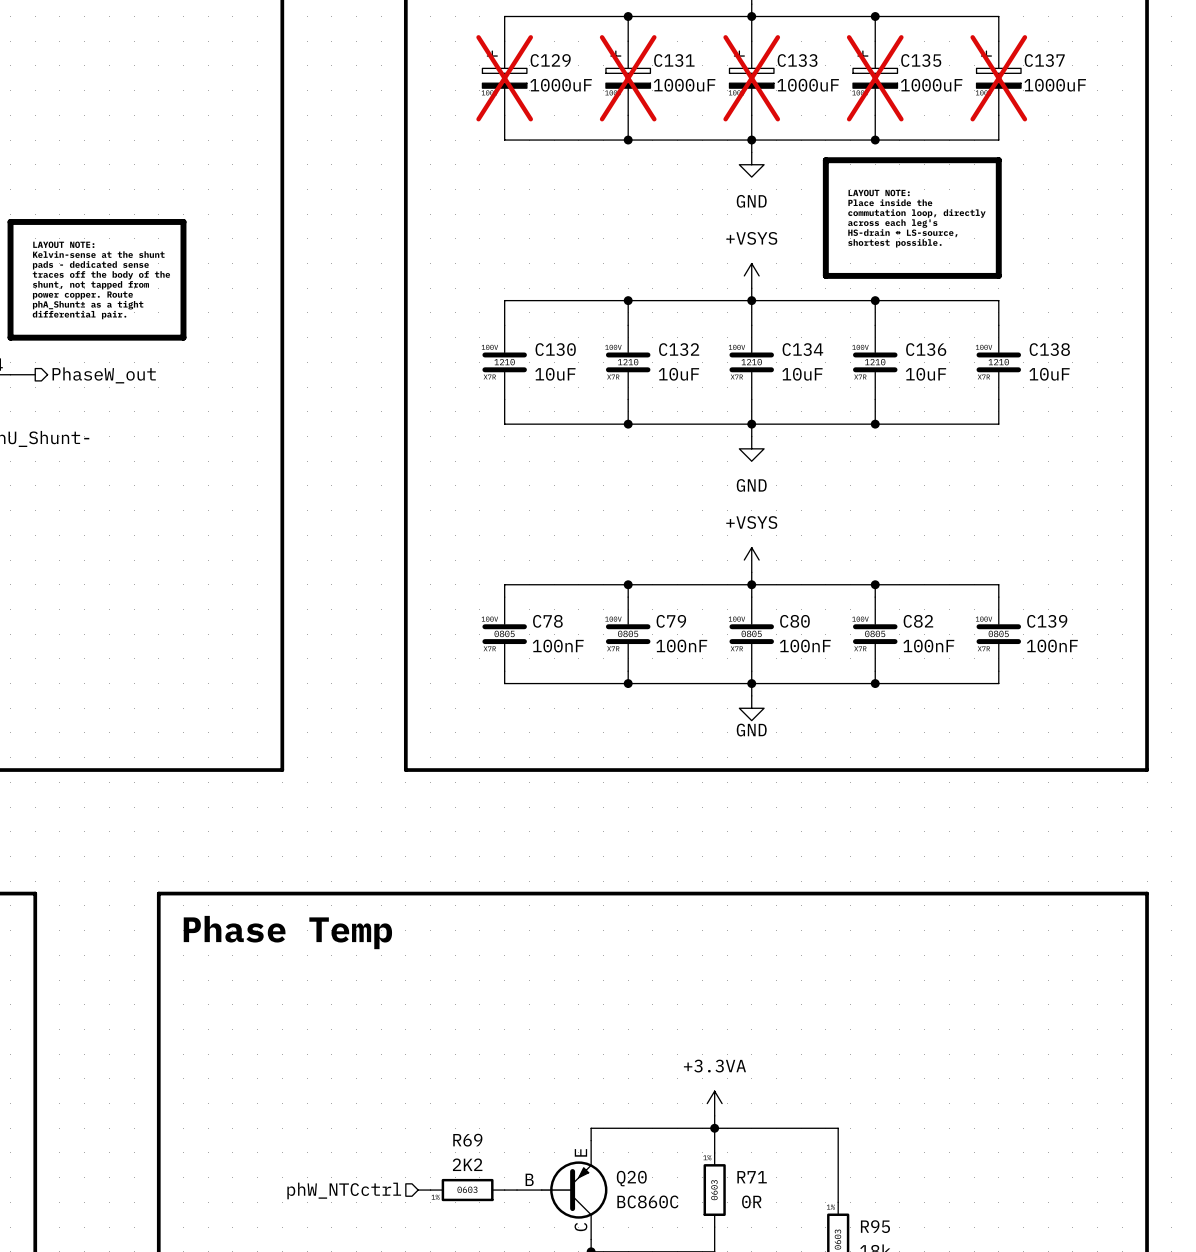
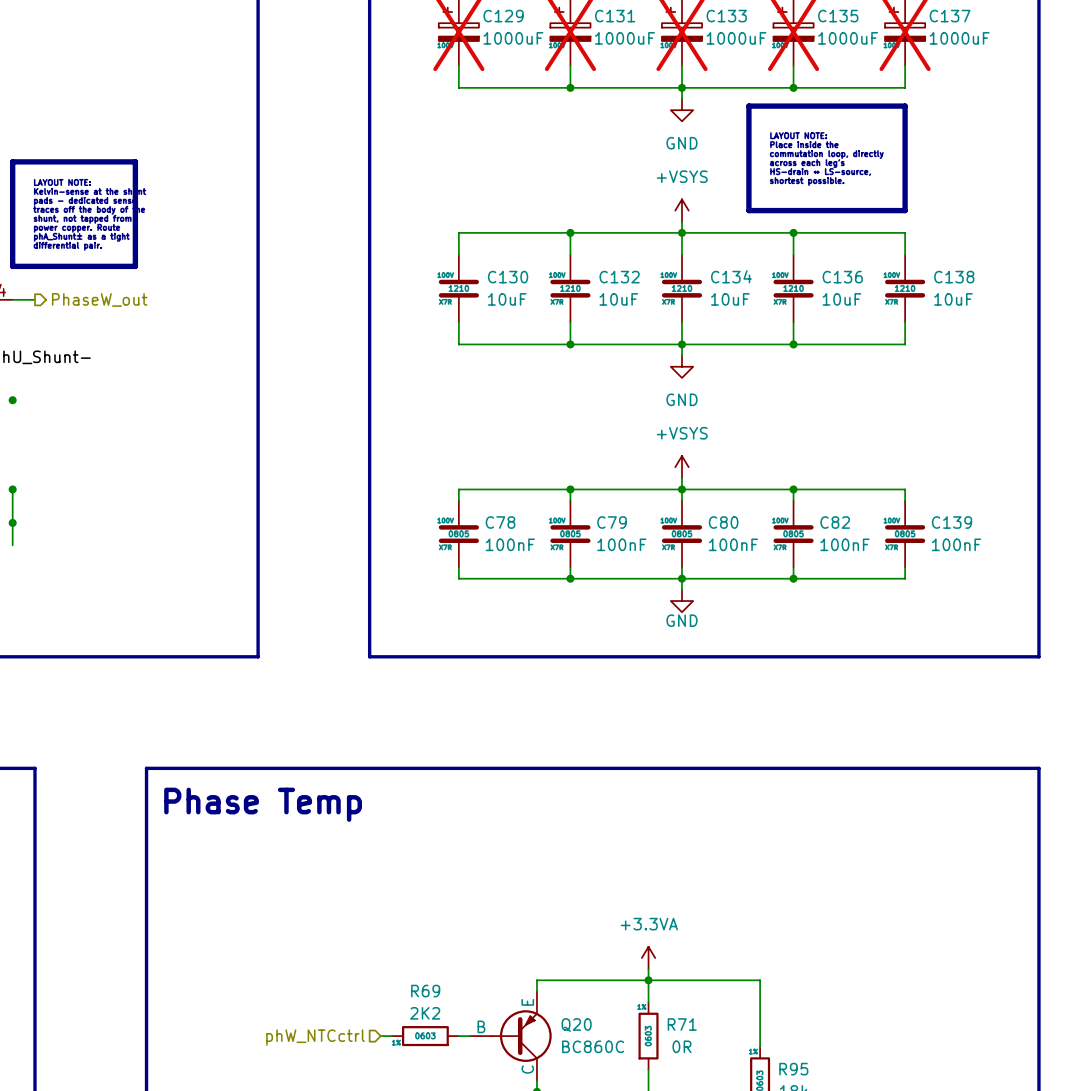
line: (146, 221) (183, 221) (183, 337) (146, 337) -> (135, 161) (135, 266)
junction: none -> (12, 400)
wire: none -> (12, 489) (12, 545)
junction: none -> (12, 489)
junction: none -> (12, 522)

